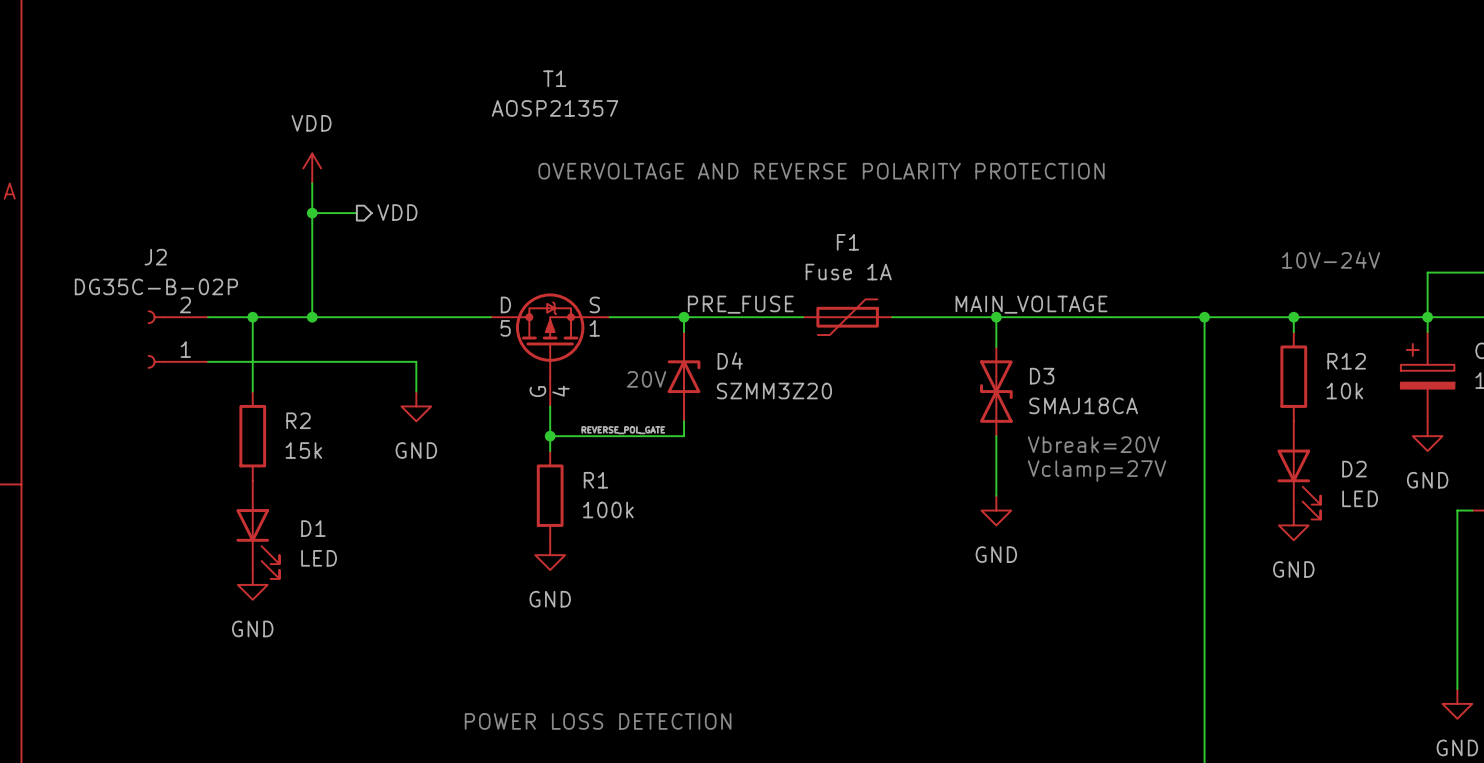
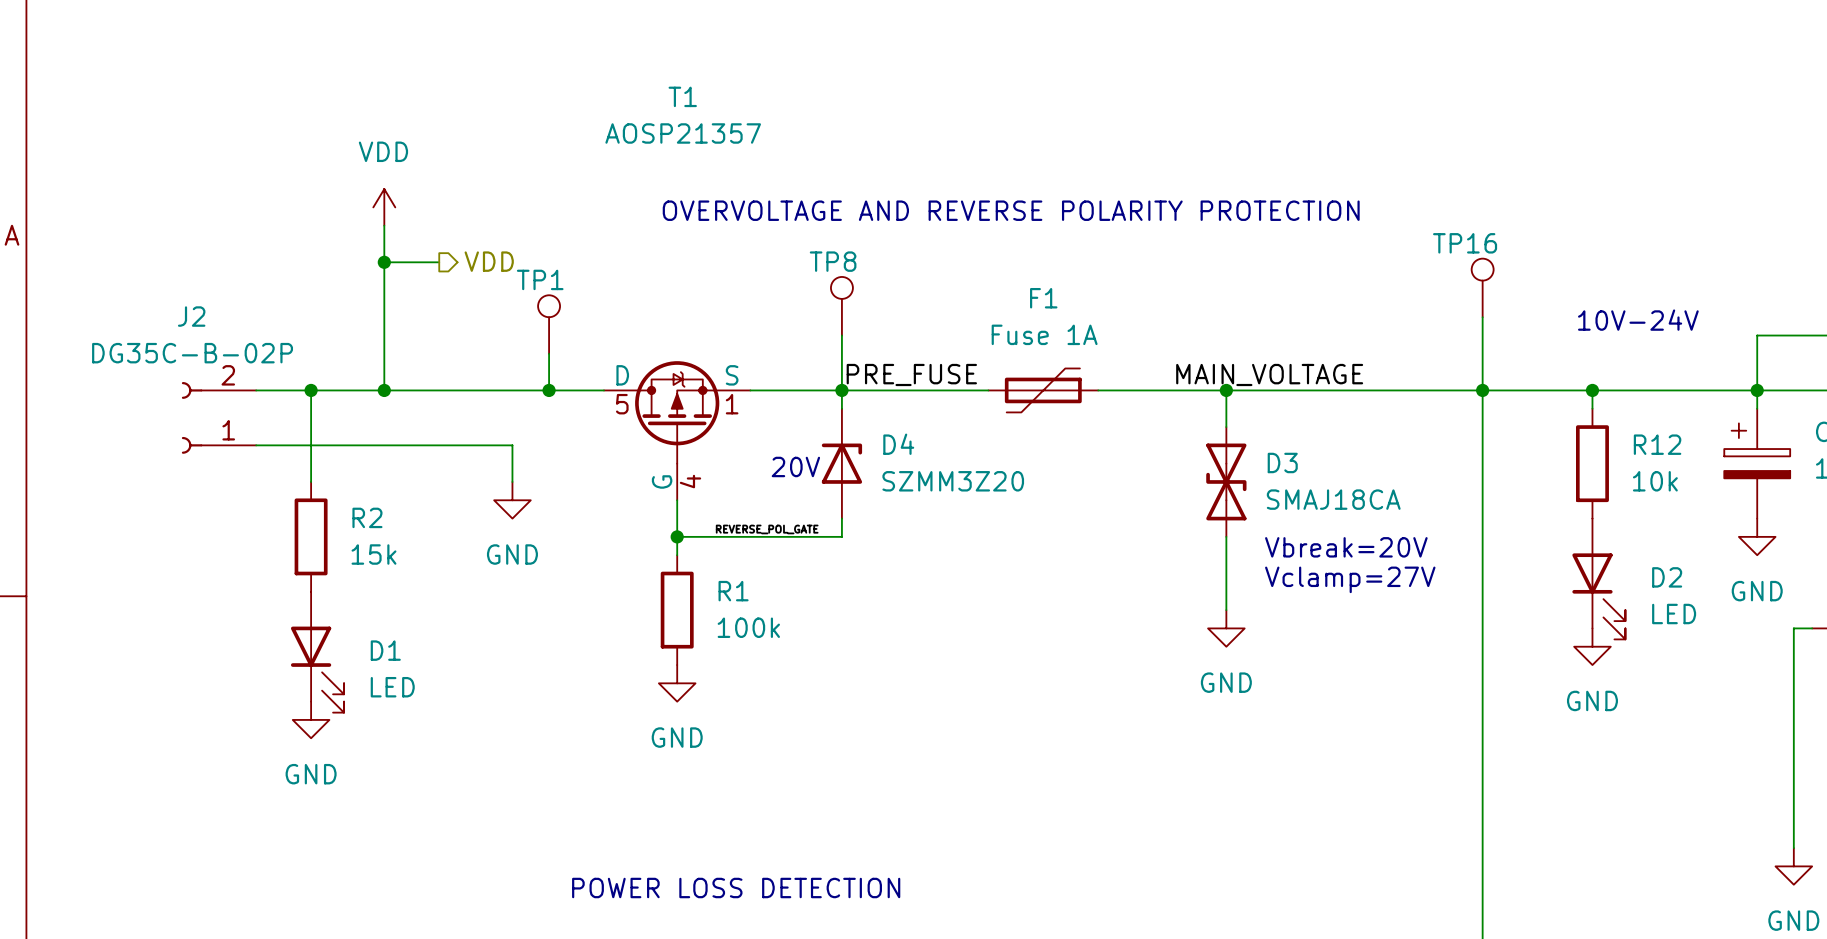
TP16: none -> (1482, 287)
TP8: none -> (841, 306)
wire: none -> (1482, 317) (1482, 390)
TP1: none -> (549, 324)
wire: none -> (841, 335) (841, 390)
wire: none -> (549, 353) (549, 390)
junction: none -> (549, 390)

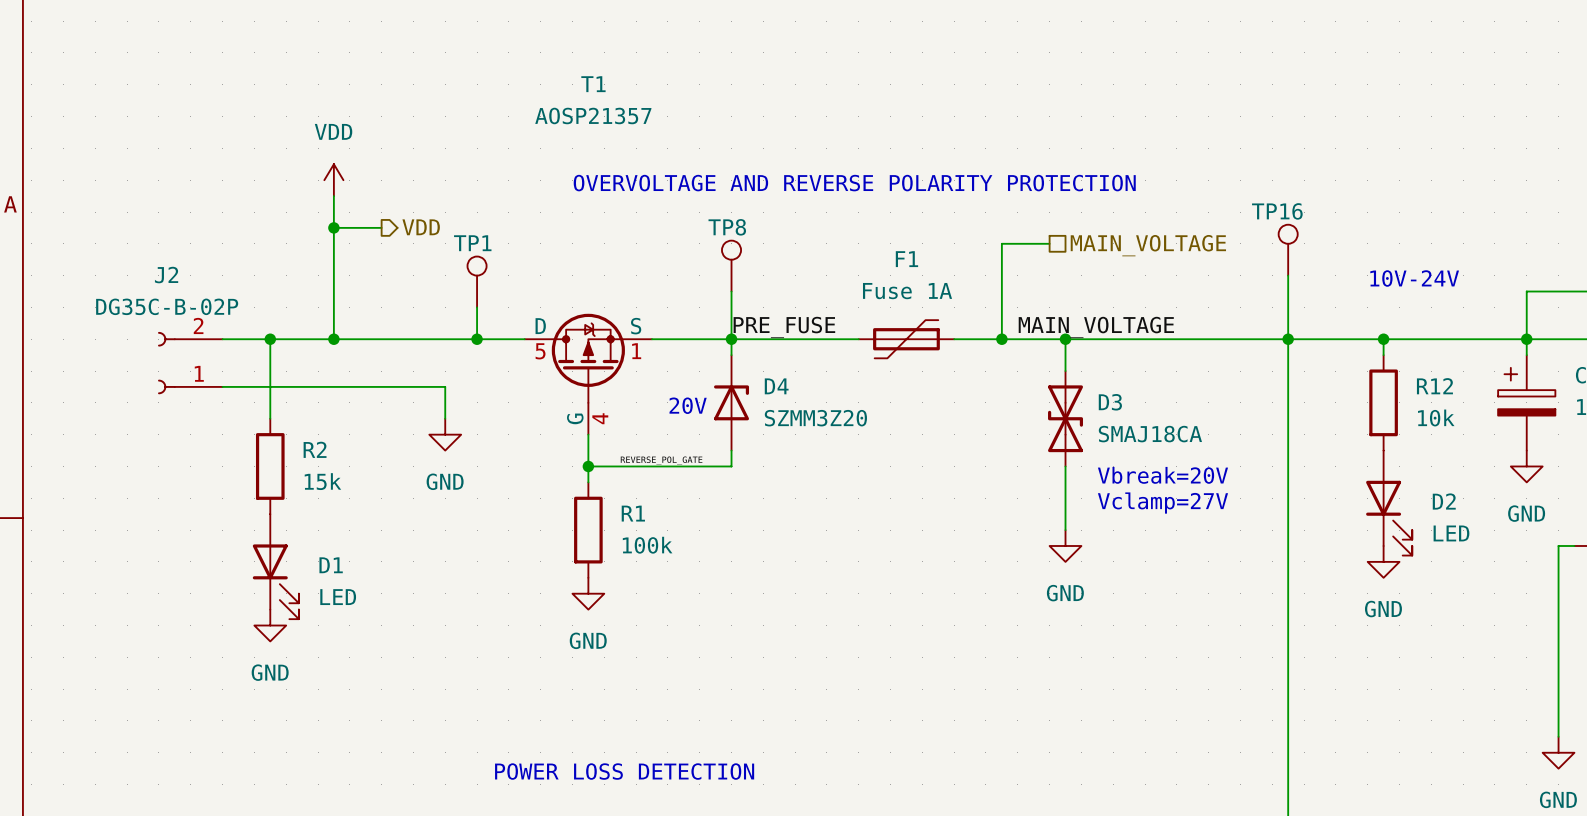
wire: none -> (1049, 243) (1001, 243) (1001, 339)
hierarchical label: none -> MAIN_VOLTAGE (1148, 245)
junction: none -> (1001, 339)

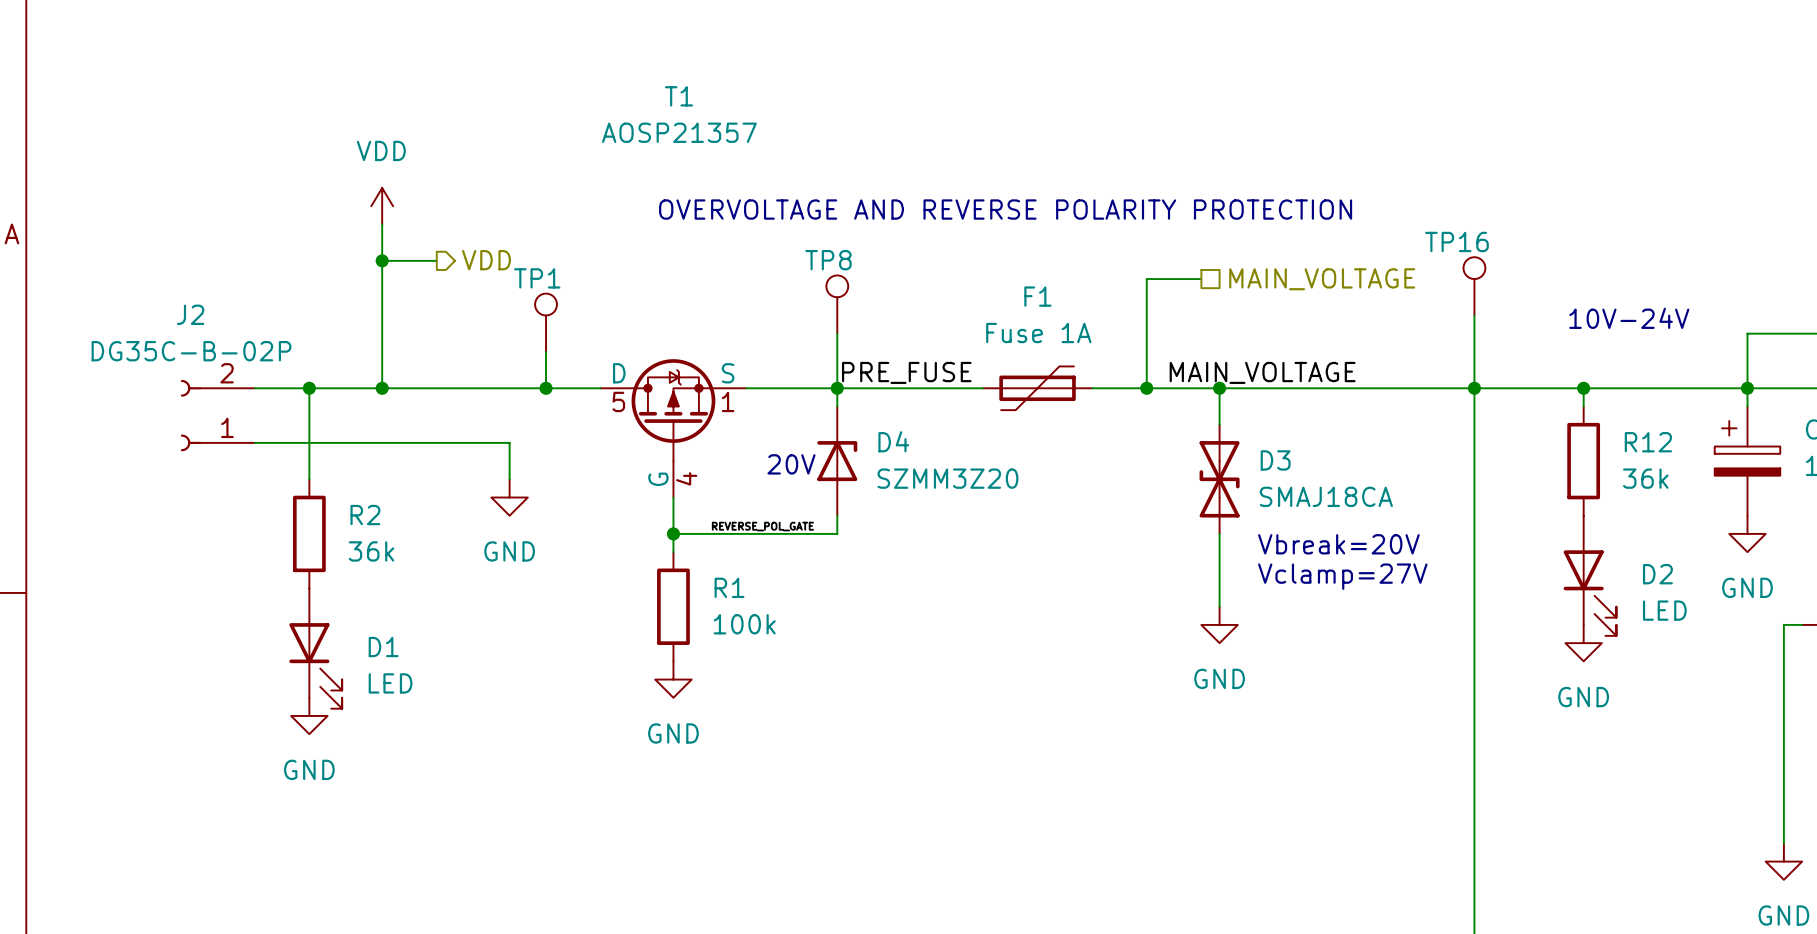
R12 value: 10k (1436, 417) -> 36k (1645, 478)
R2 value: 15k (322, 481) -> 36k (371, 551)
text: POWER LOSS DETECTION (624, 771) -> none

